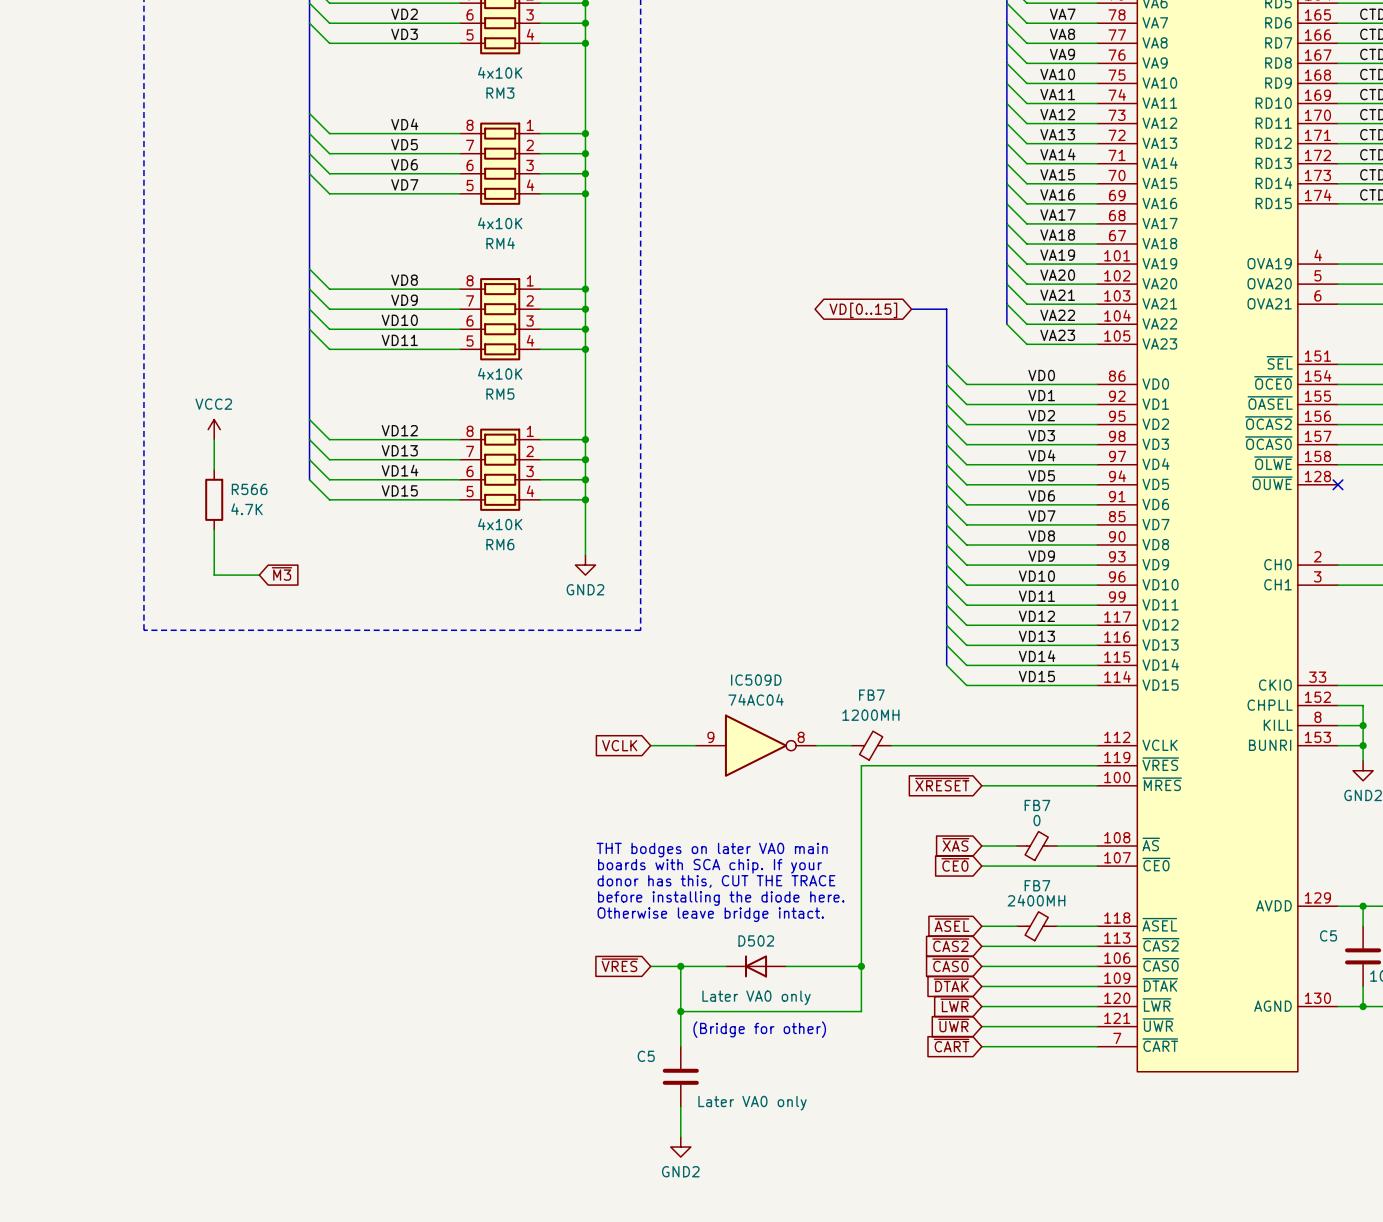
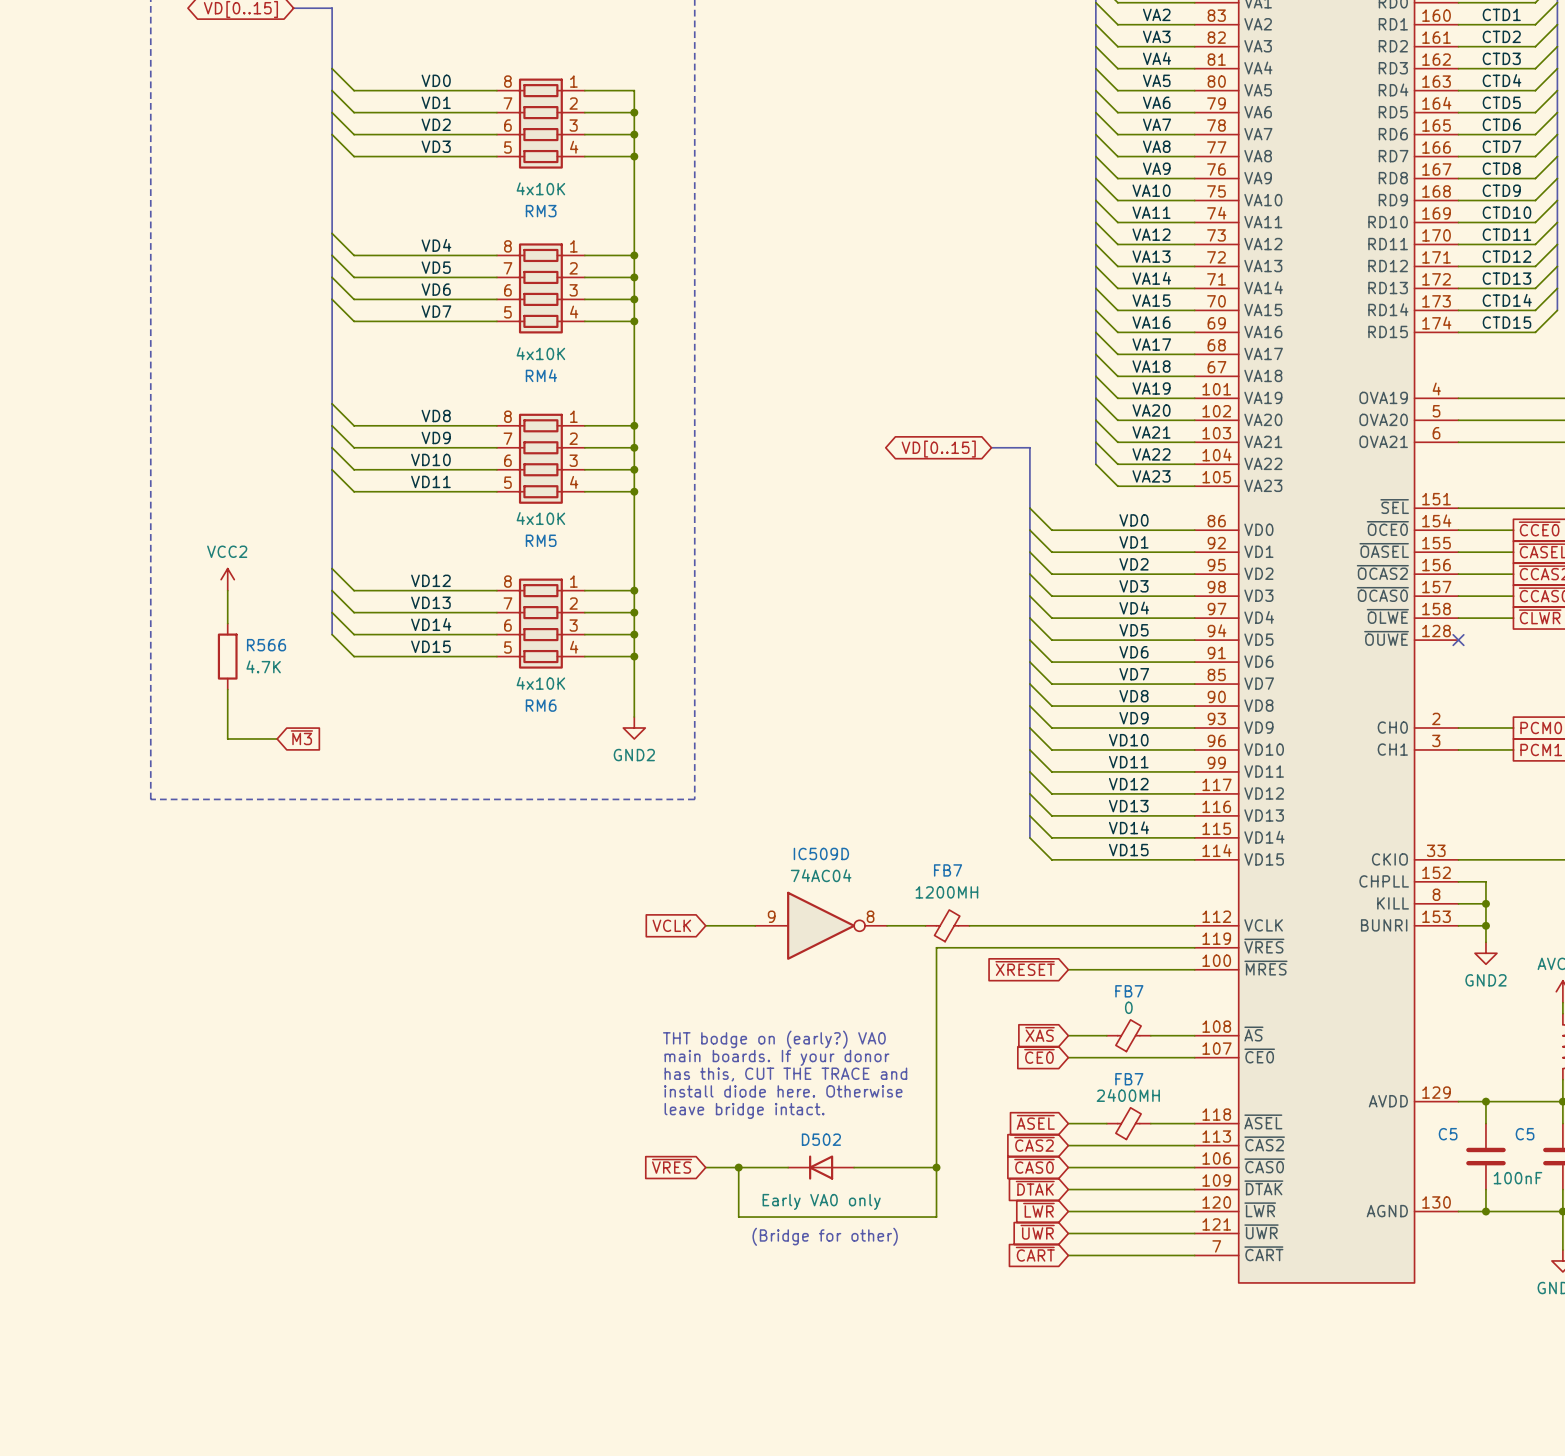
text: THT bodges on later VA0 main (712, 850) -> THT bodge on (early?) VA0 (774, 1039)
text: boards with SCA chip. If your (710, 866) -> none
text: none -> main boards. If your donor (776, 1057)
text: donor has this, CUT THE TRACE (716, 881) -> has this, CUT THE TRACE and (785, 1074)
text: before installing the diode here. (721, 898) -> install diode here. Otherwise (783, 1091)
text: Otherwise leave bridge intact. (710, 914) -> leave bridge intact. (744, 1110)
D502 value: Later VA0 only (756, 997) -> Early VA0 only (821, 1201)
wire: (680, 1011) (680, 1046) -> none
junction: (680, 1011) -> none
C5: Later VA0 only (680, 1076) -> none
wire: (680, 1106) (680, 1136) -> none
power symbol: GND2 (680, 1147) -> none

